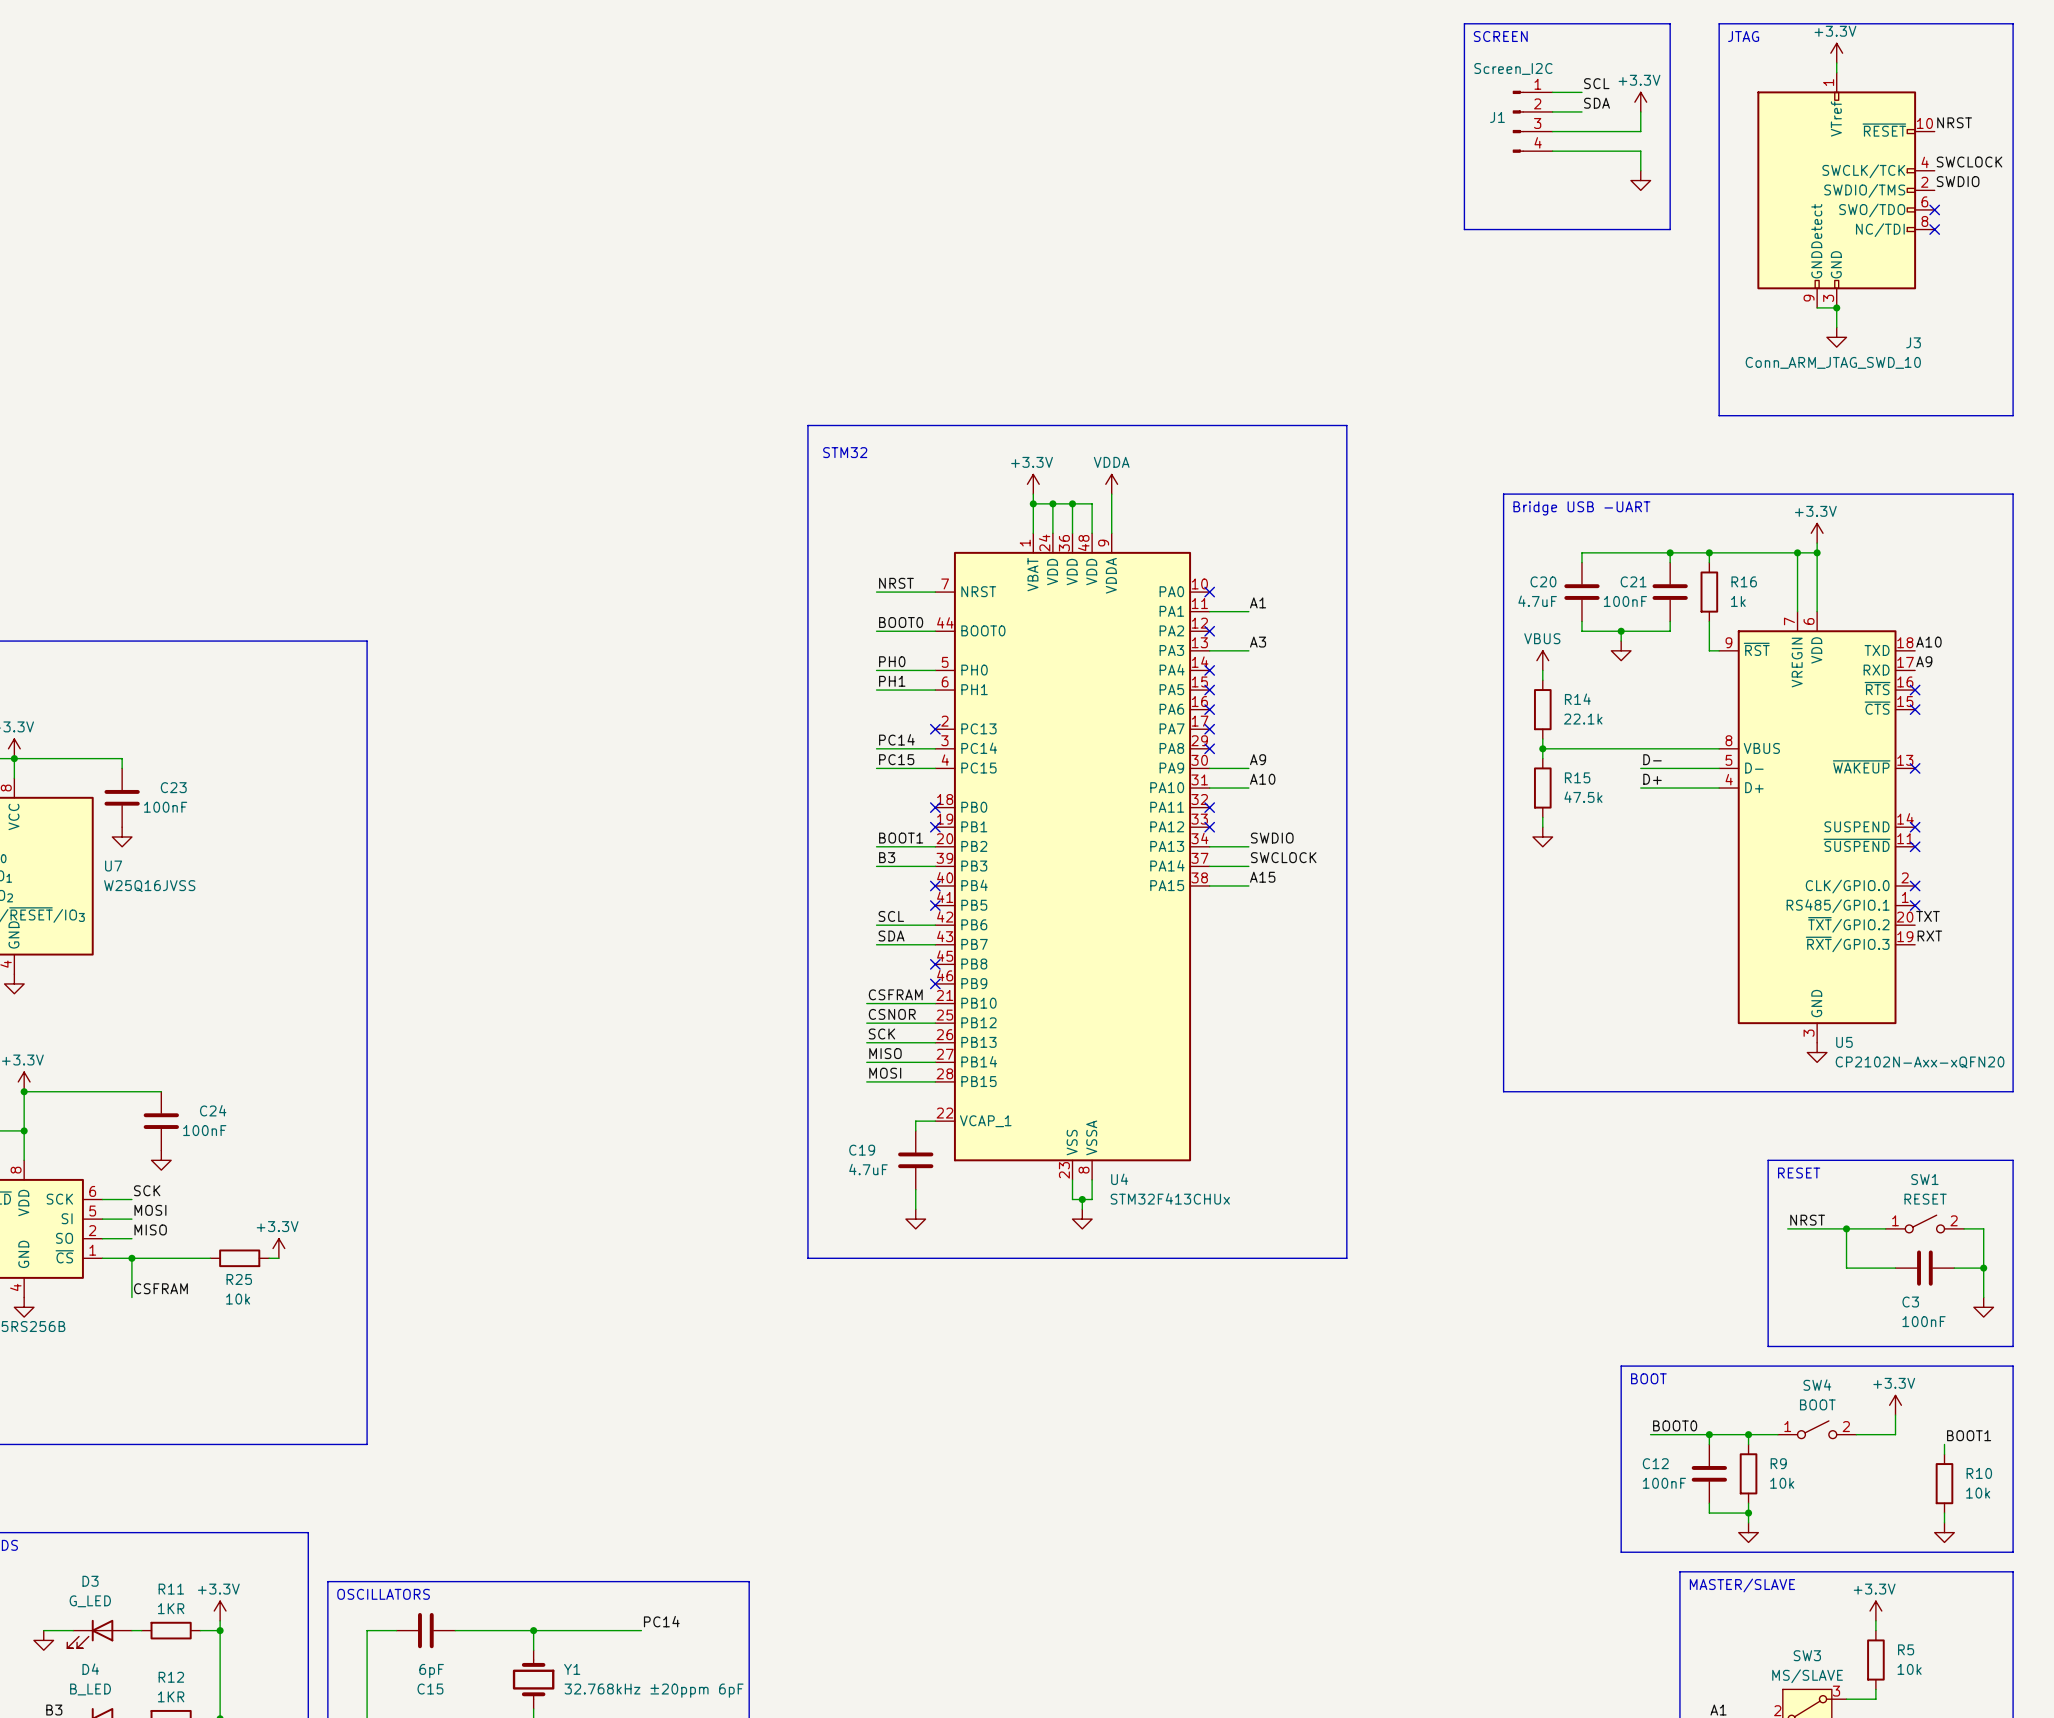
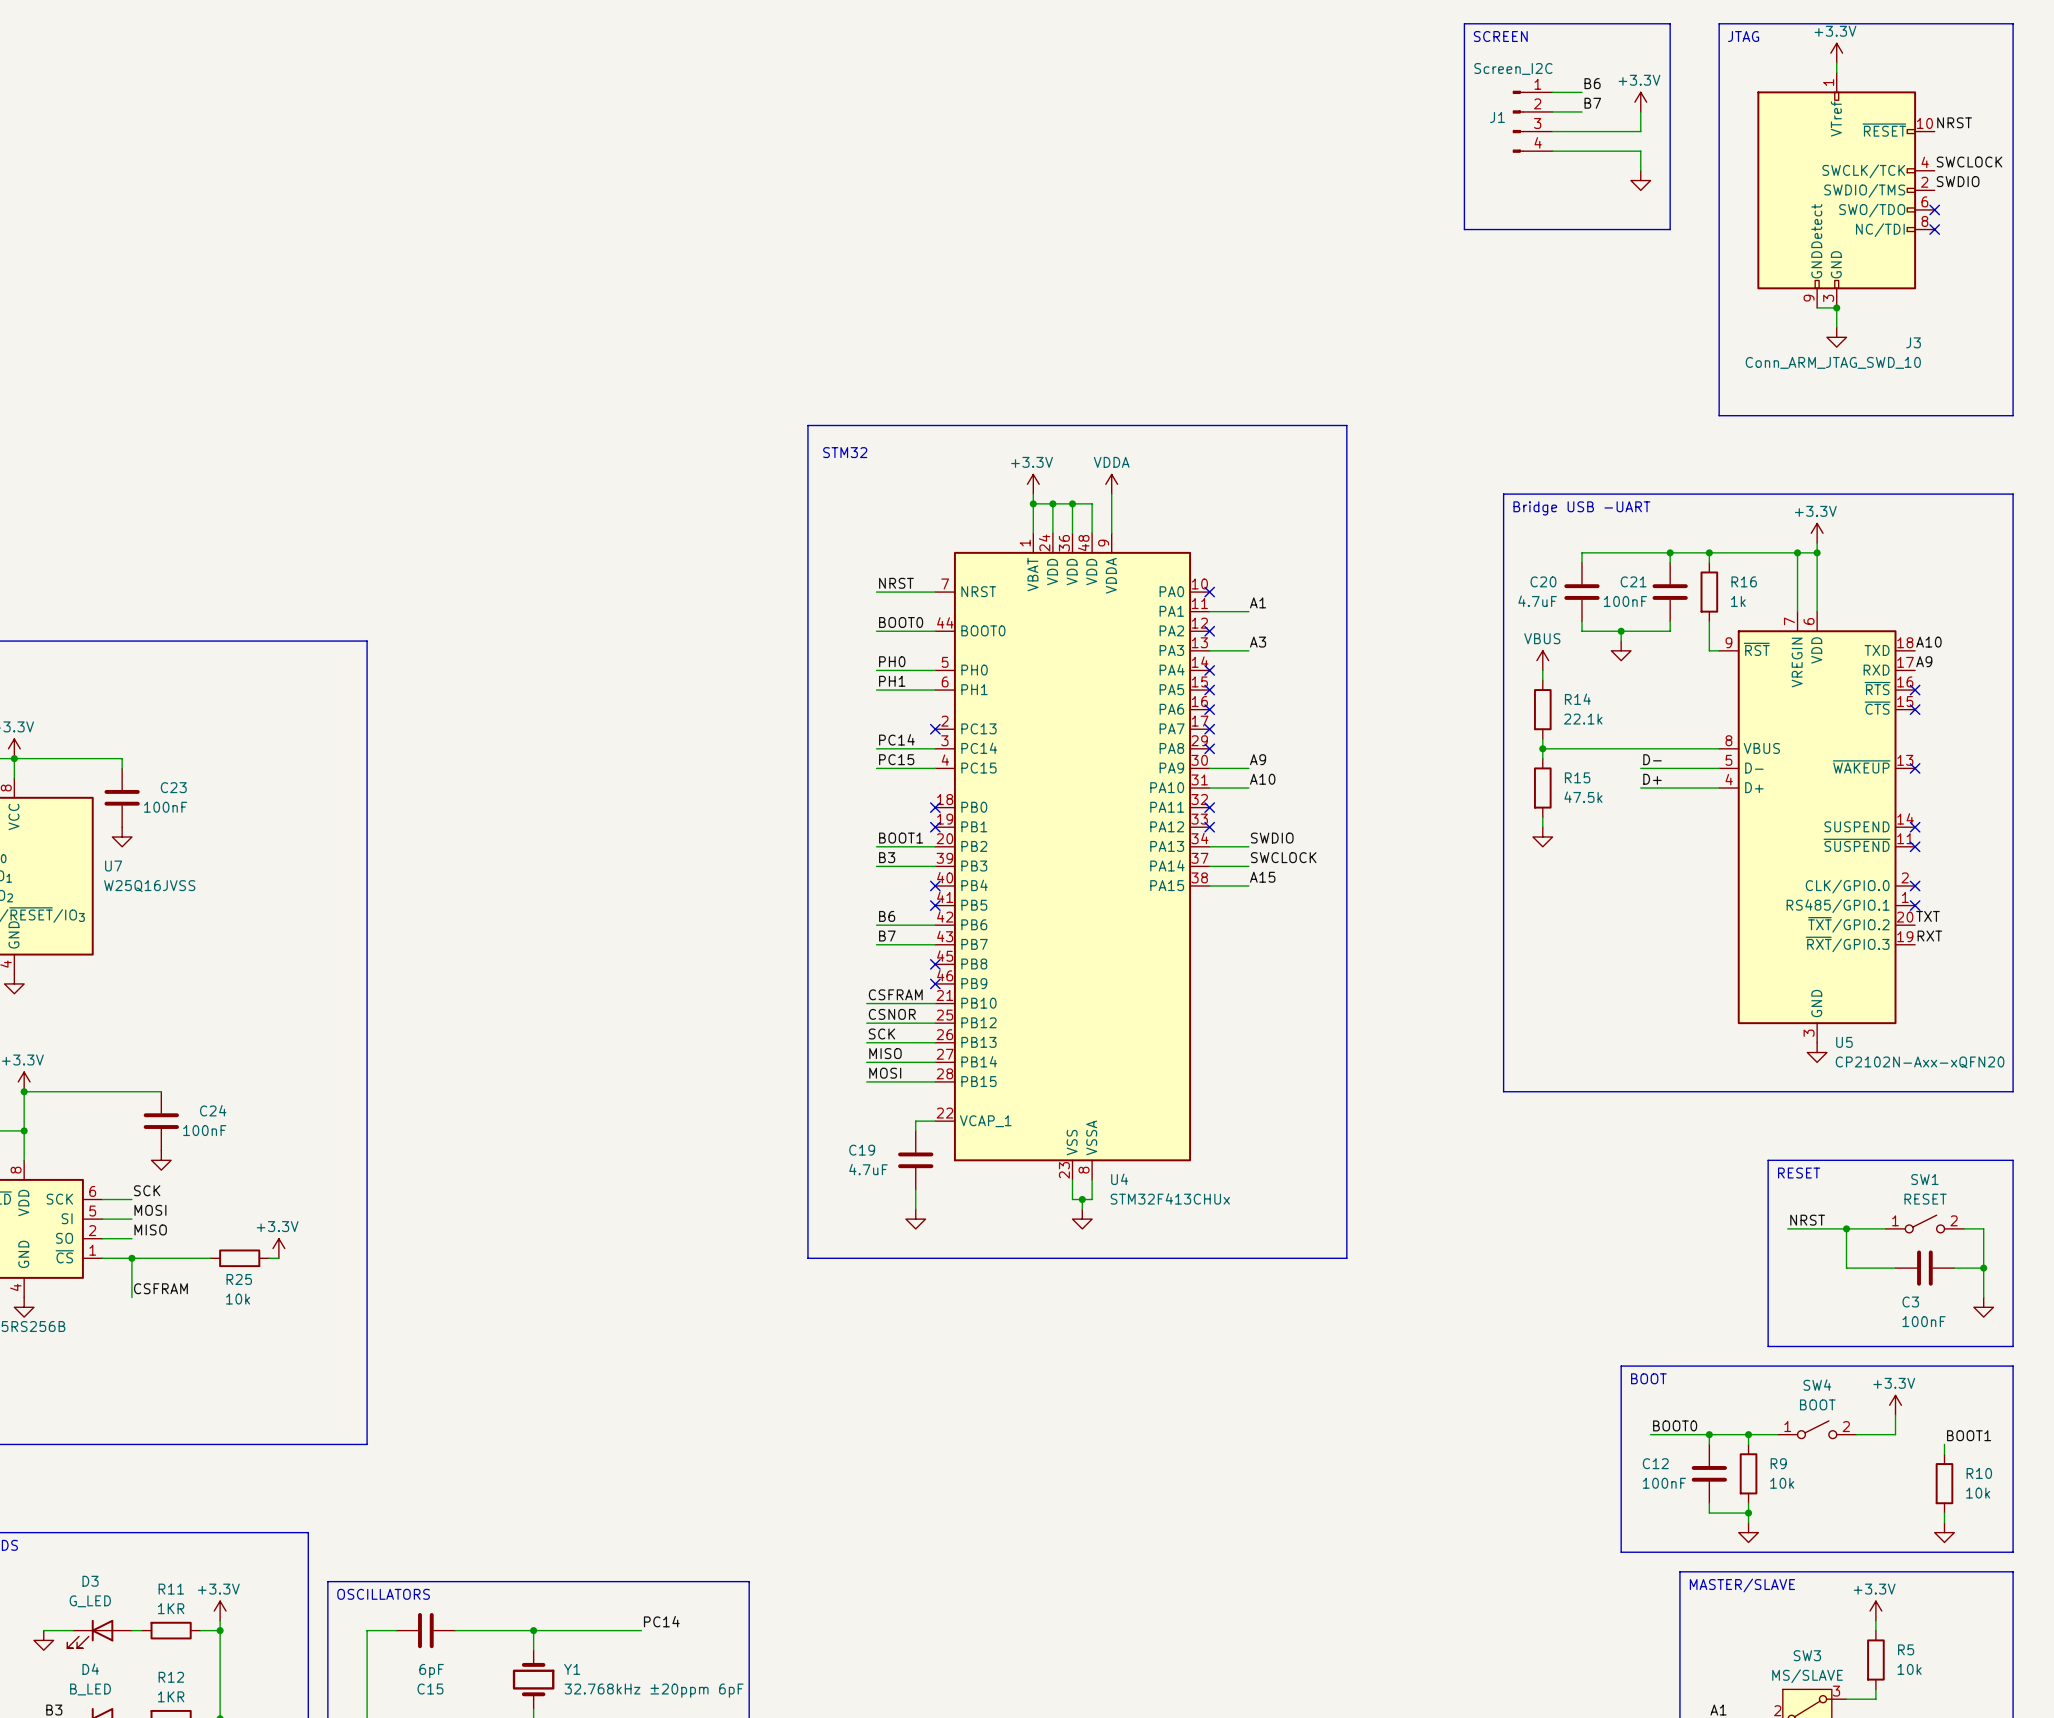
label: SCL (1596, 83) -> B6 (1592, 83)
label: SDA (1596, 103) -> B7 (1592, 103)
label: SCL (891, 916) -> B6 (887, 916)
label: SDA (891, 936) -> B7 (887, 936)

